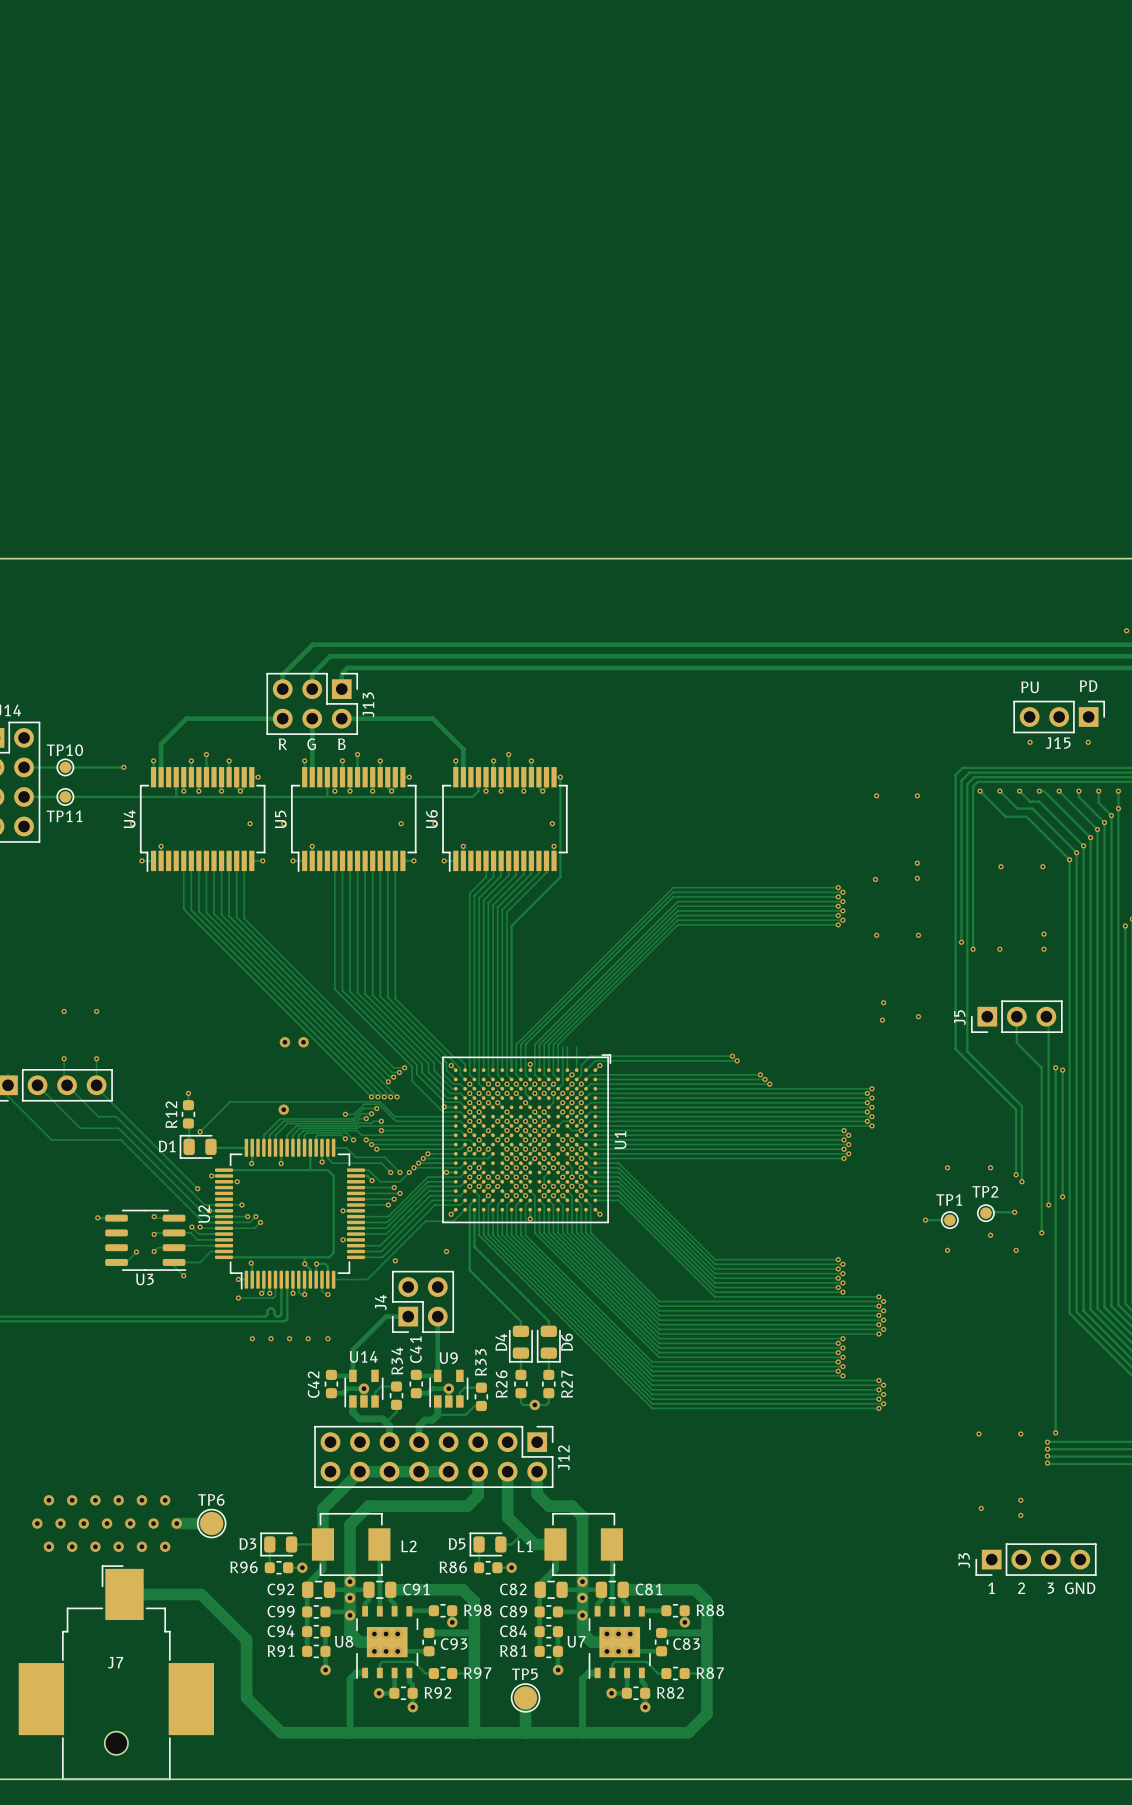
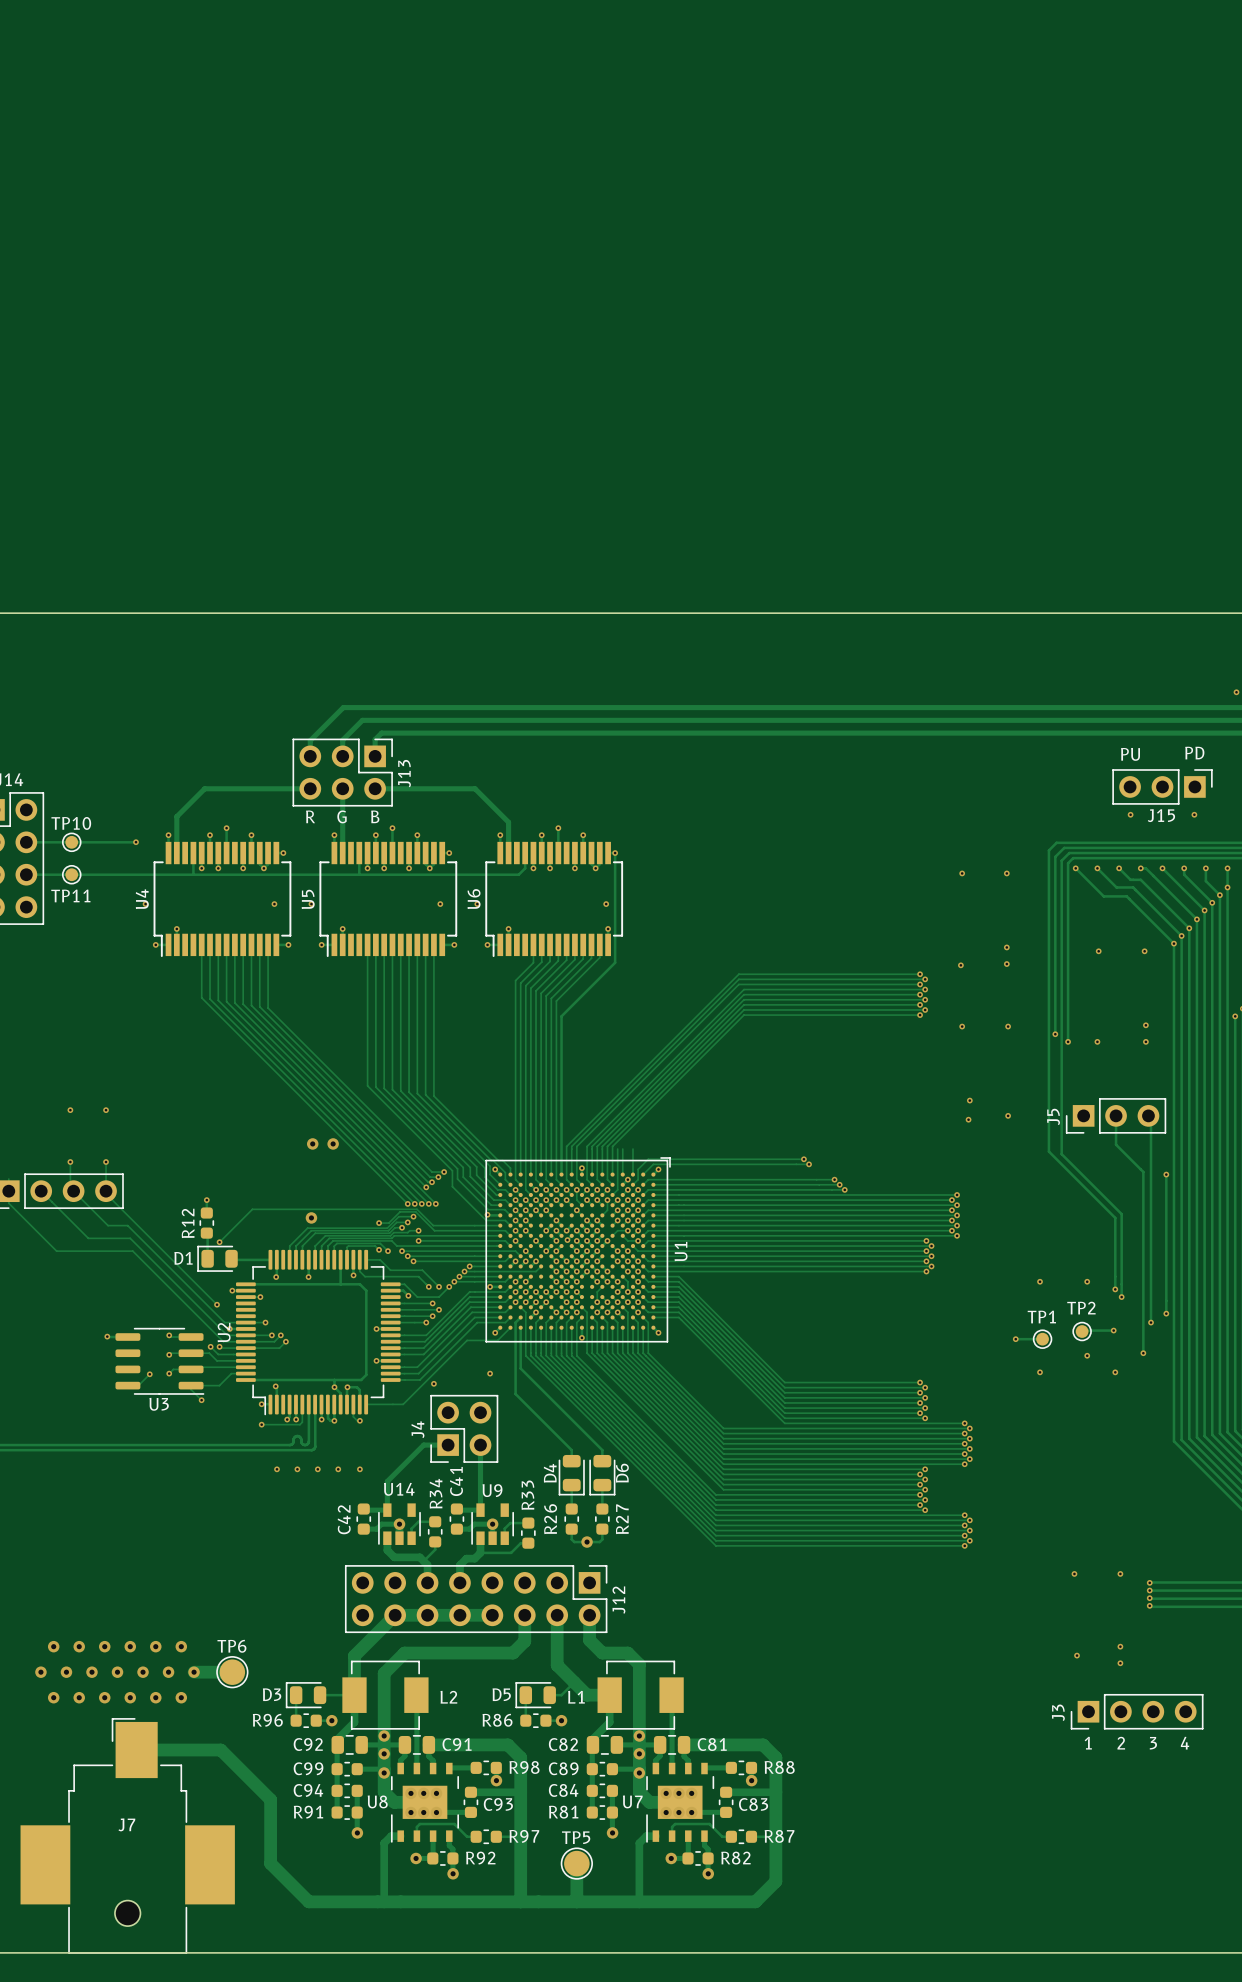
track: (1055, 1067) (1055, 1432) -> none
via: (1055, 1067) -> none
via: (1055, 1432) -> none
text: GND (1080, 1588) -> 4 (1185, 1743)

